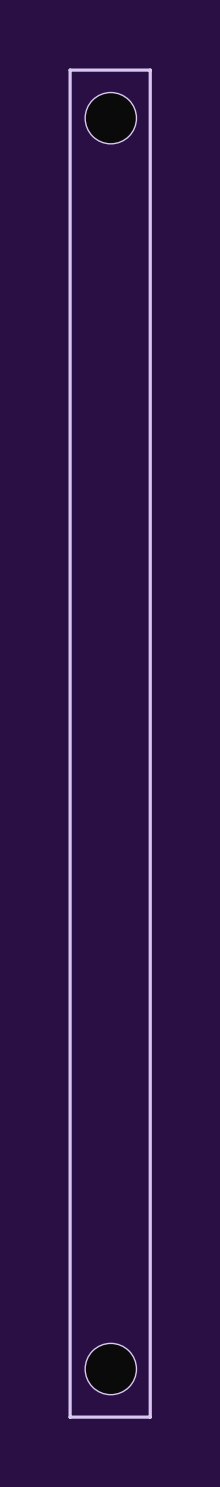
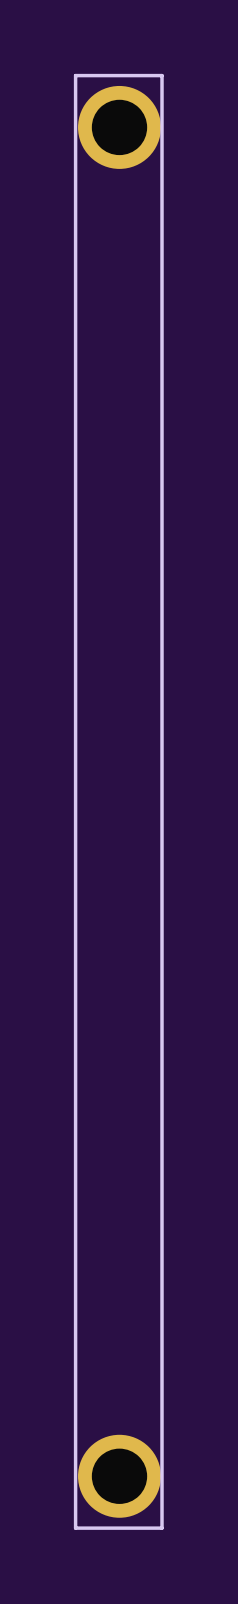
part footprint: [85, 92, 137, 144] -> [78, 85, 161, 169]
part footprint: [85, 1343, 137, 1395] -> [78, 1434, 161, 1518]

